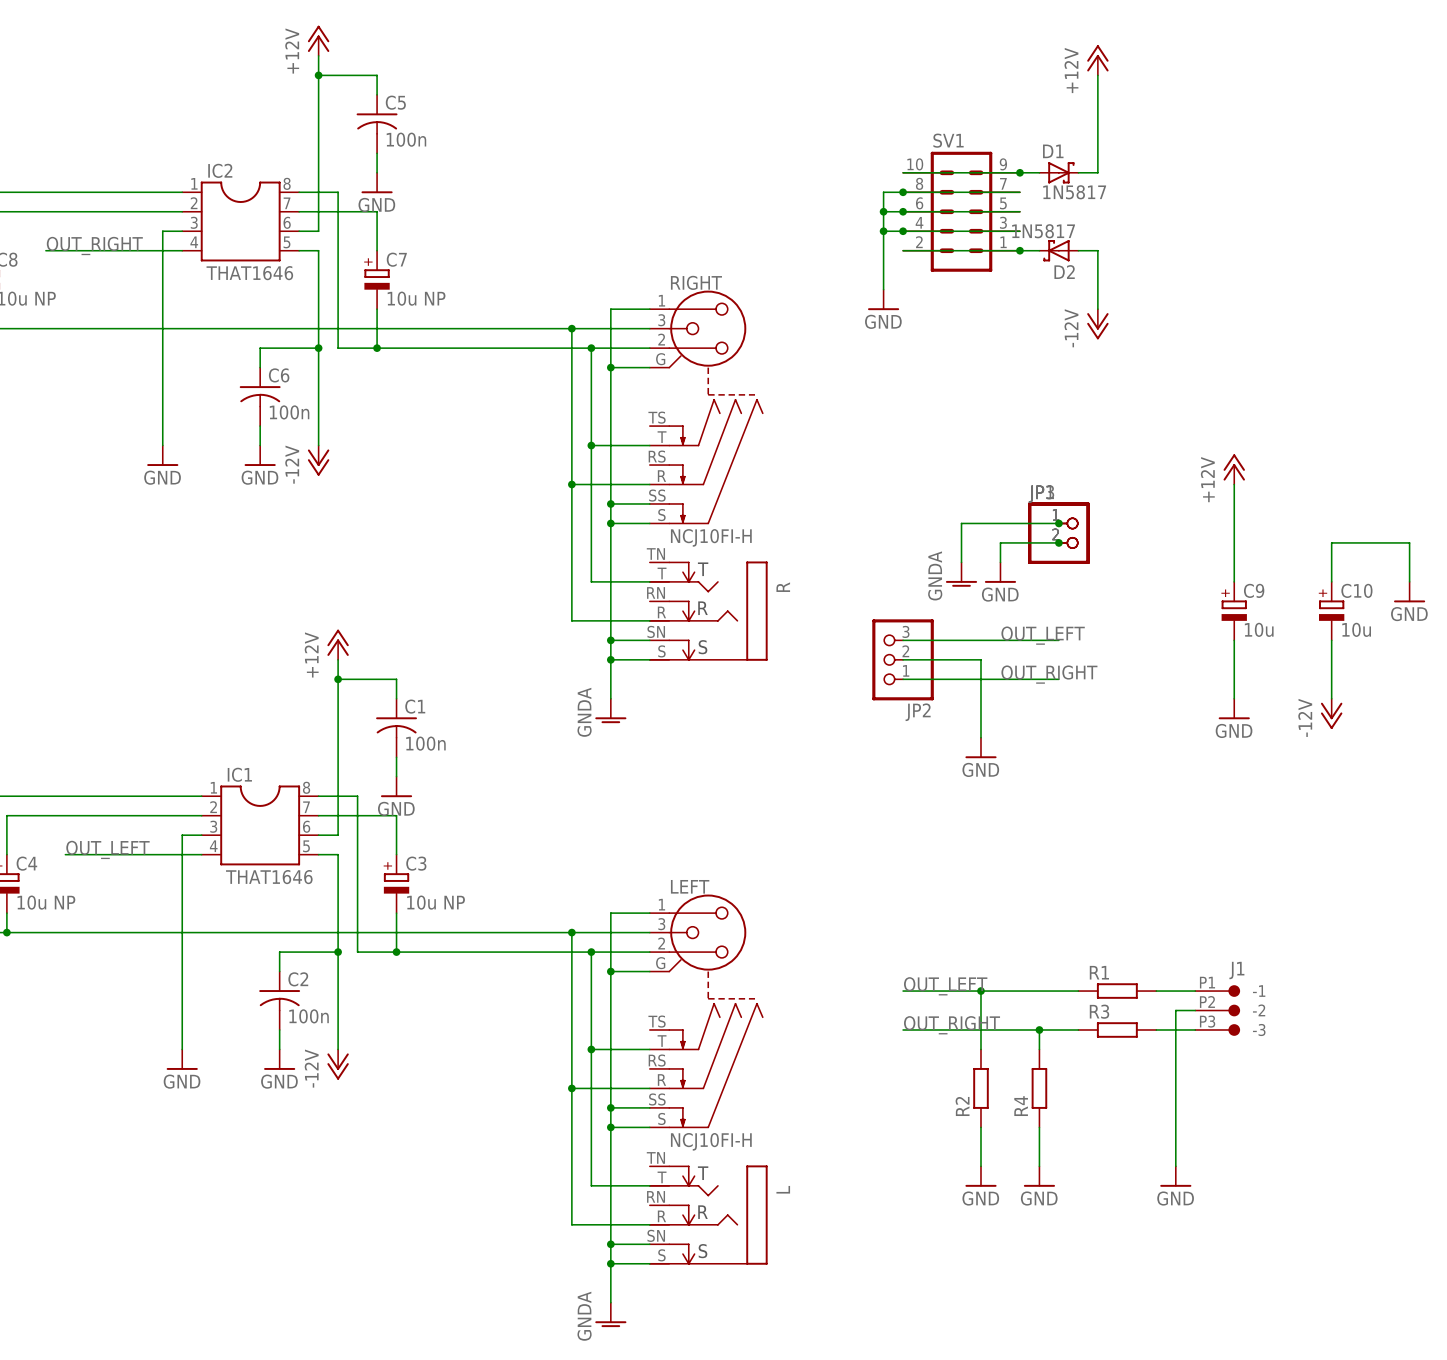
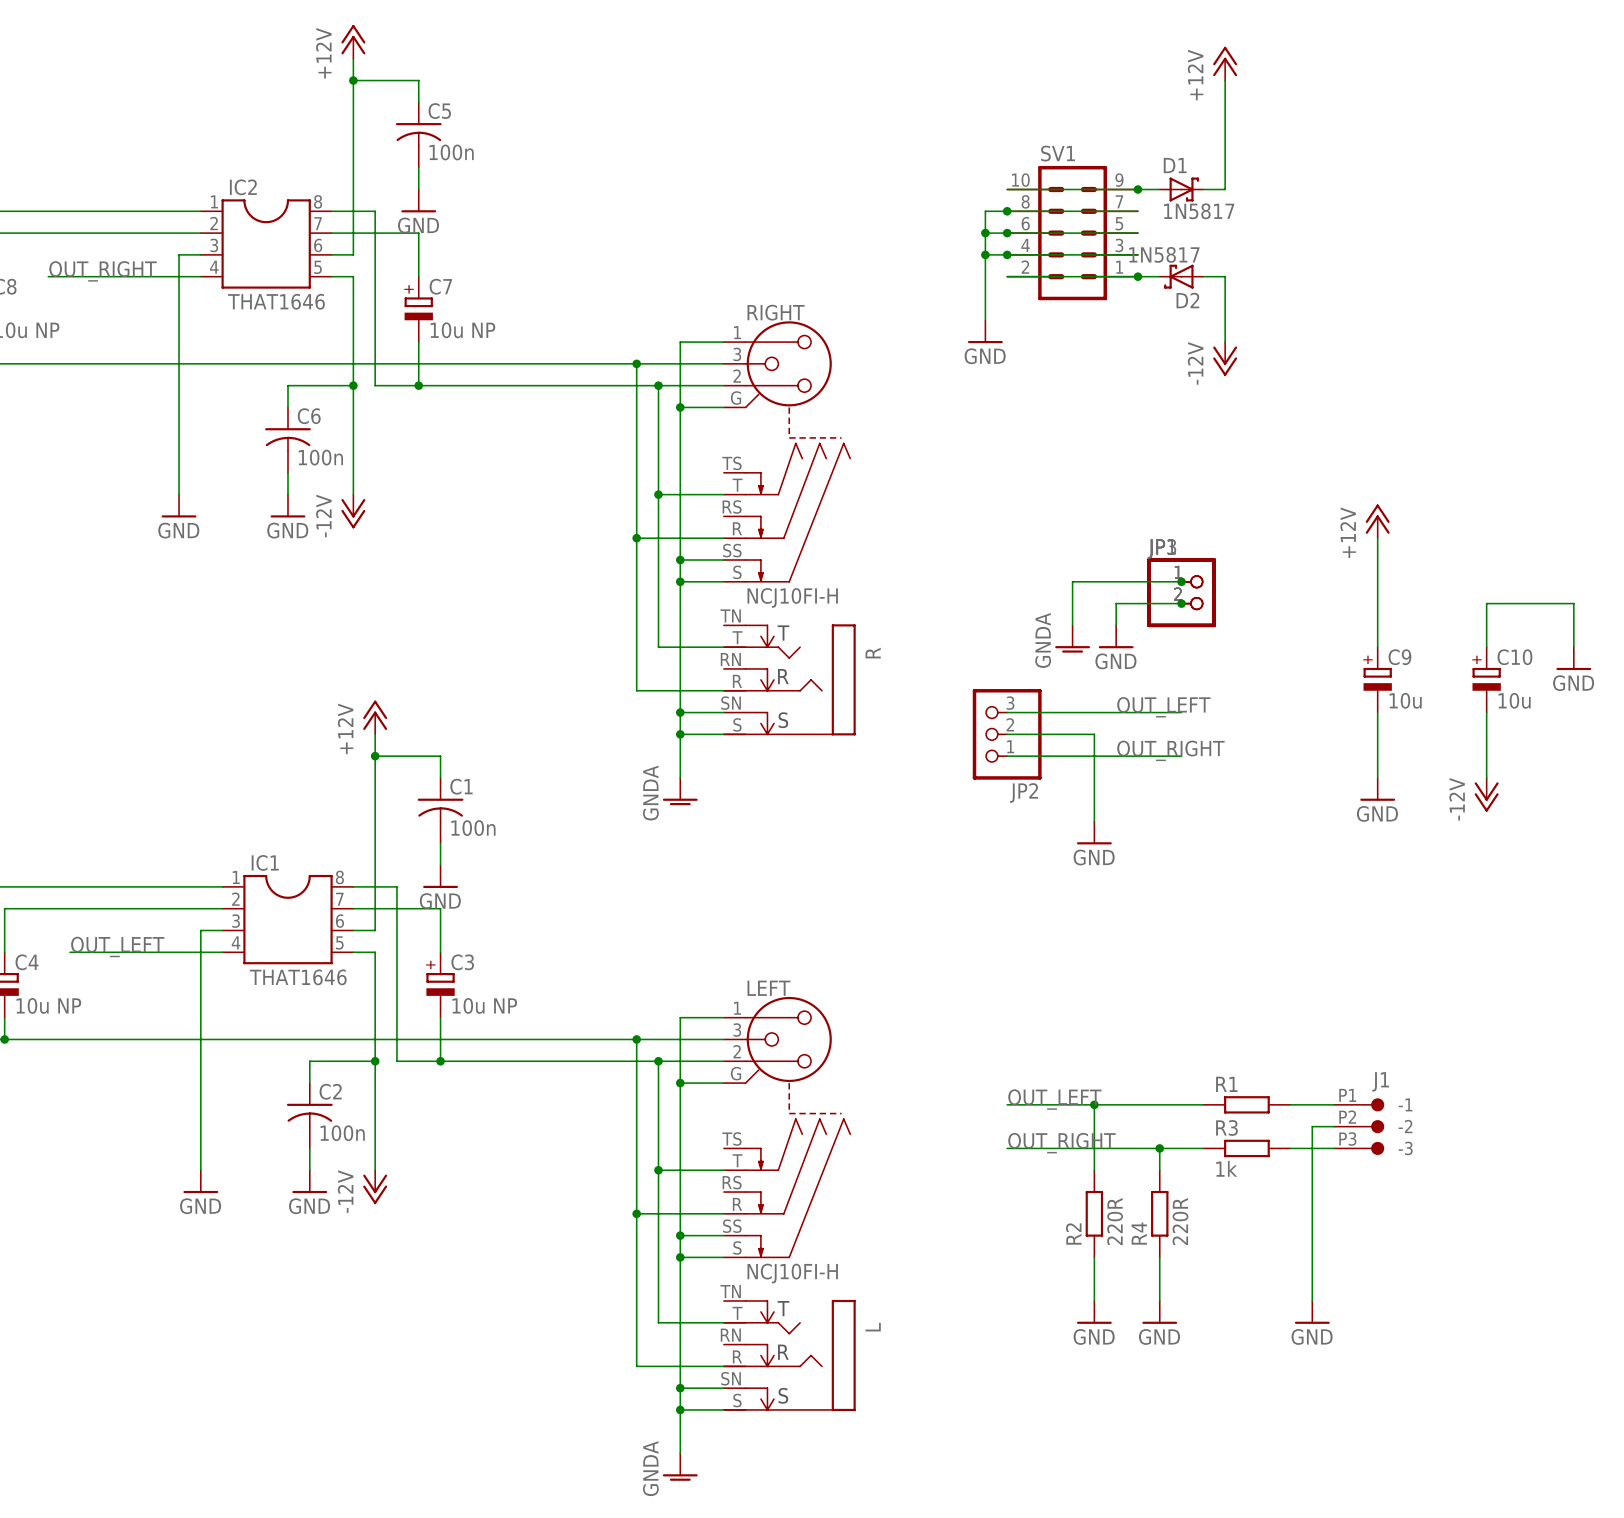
R3 value: none -> 1k (1226, 1168)
R2 value: none -> 220R (1115, 1221)
R4 value: none -> 220R (1180, 1221)

